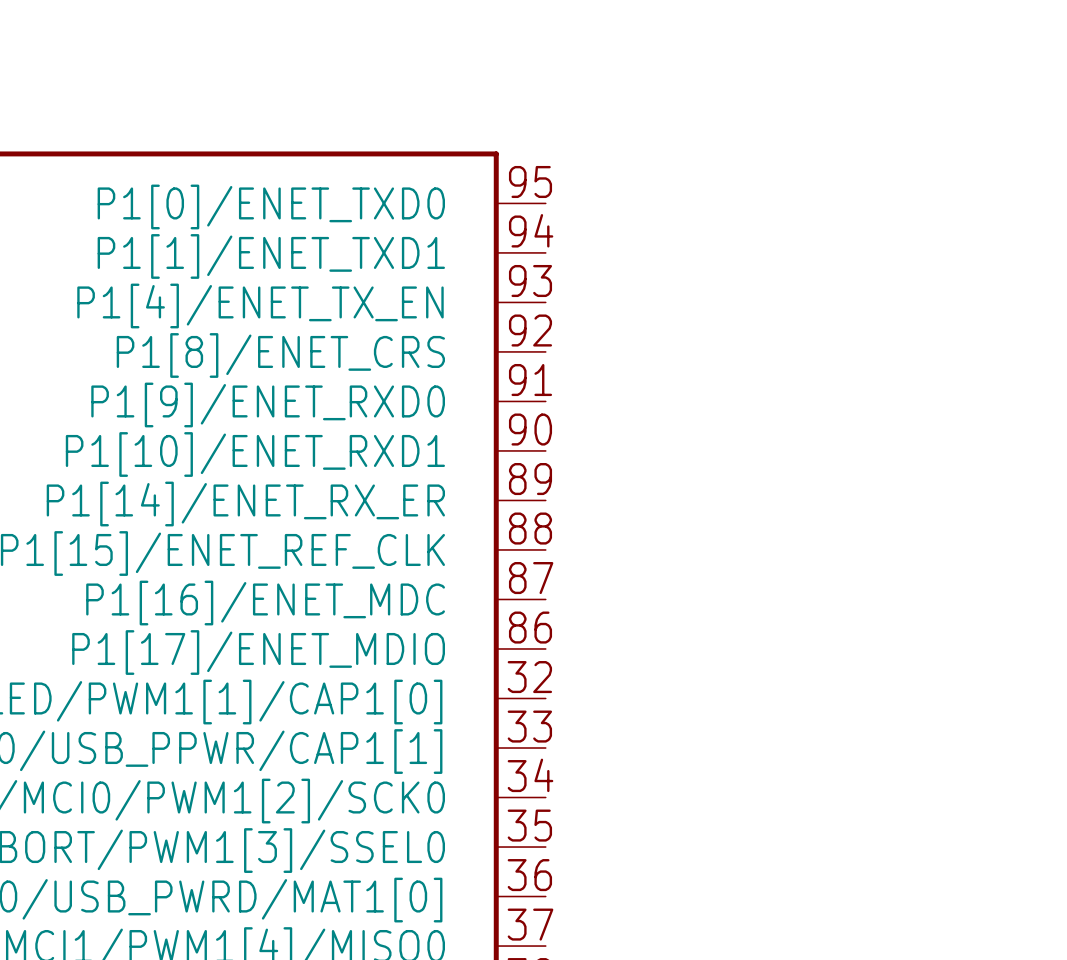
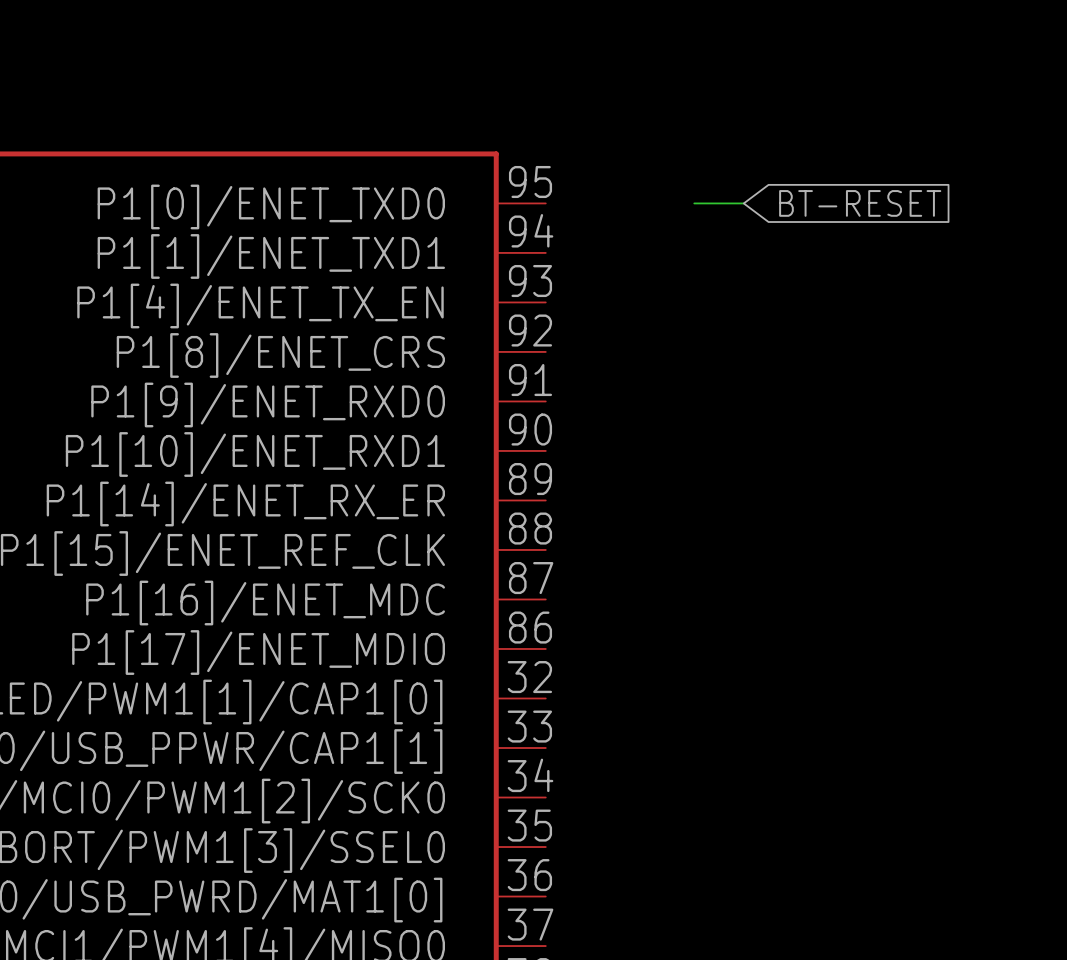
wire: none -> (694, 203) (743, 203)
global label: none -> BT-RESET (860, 203)

